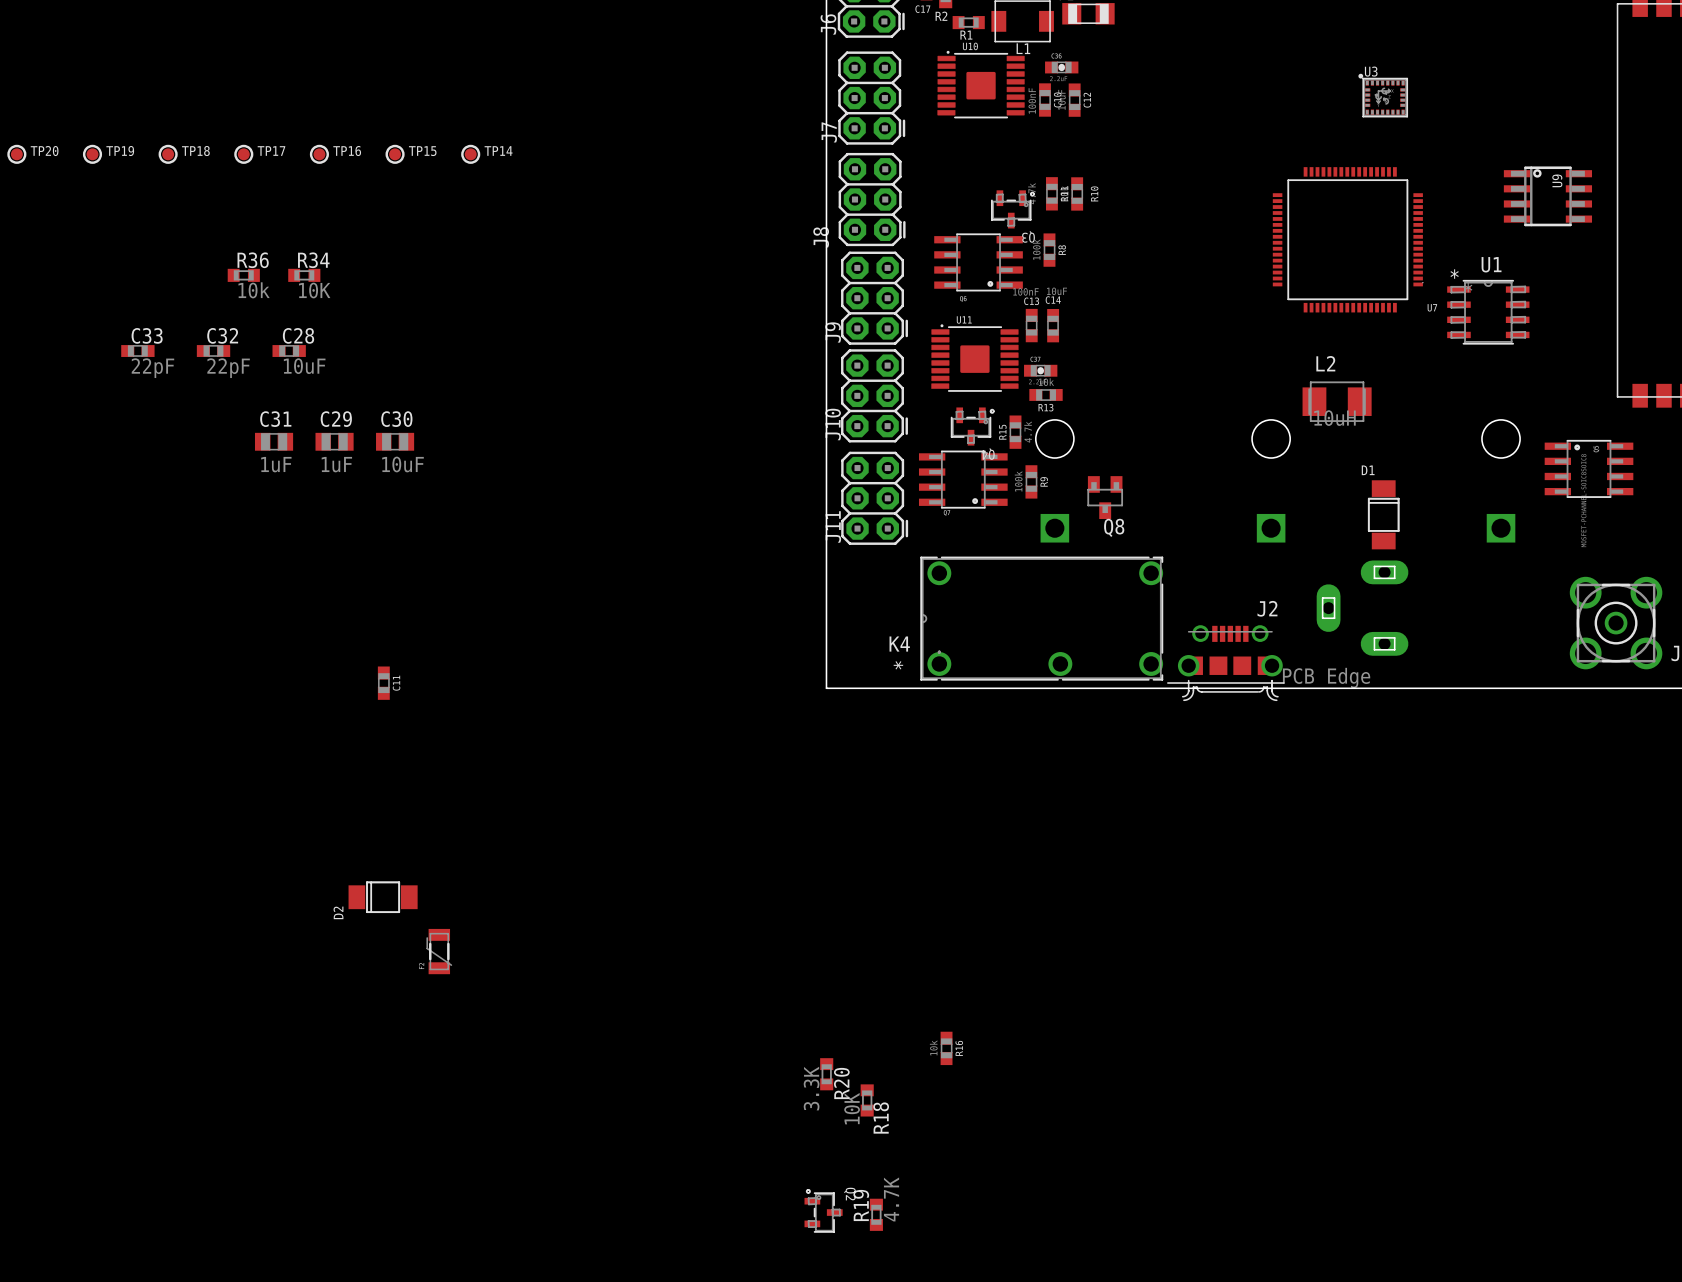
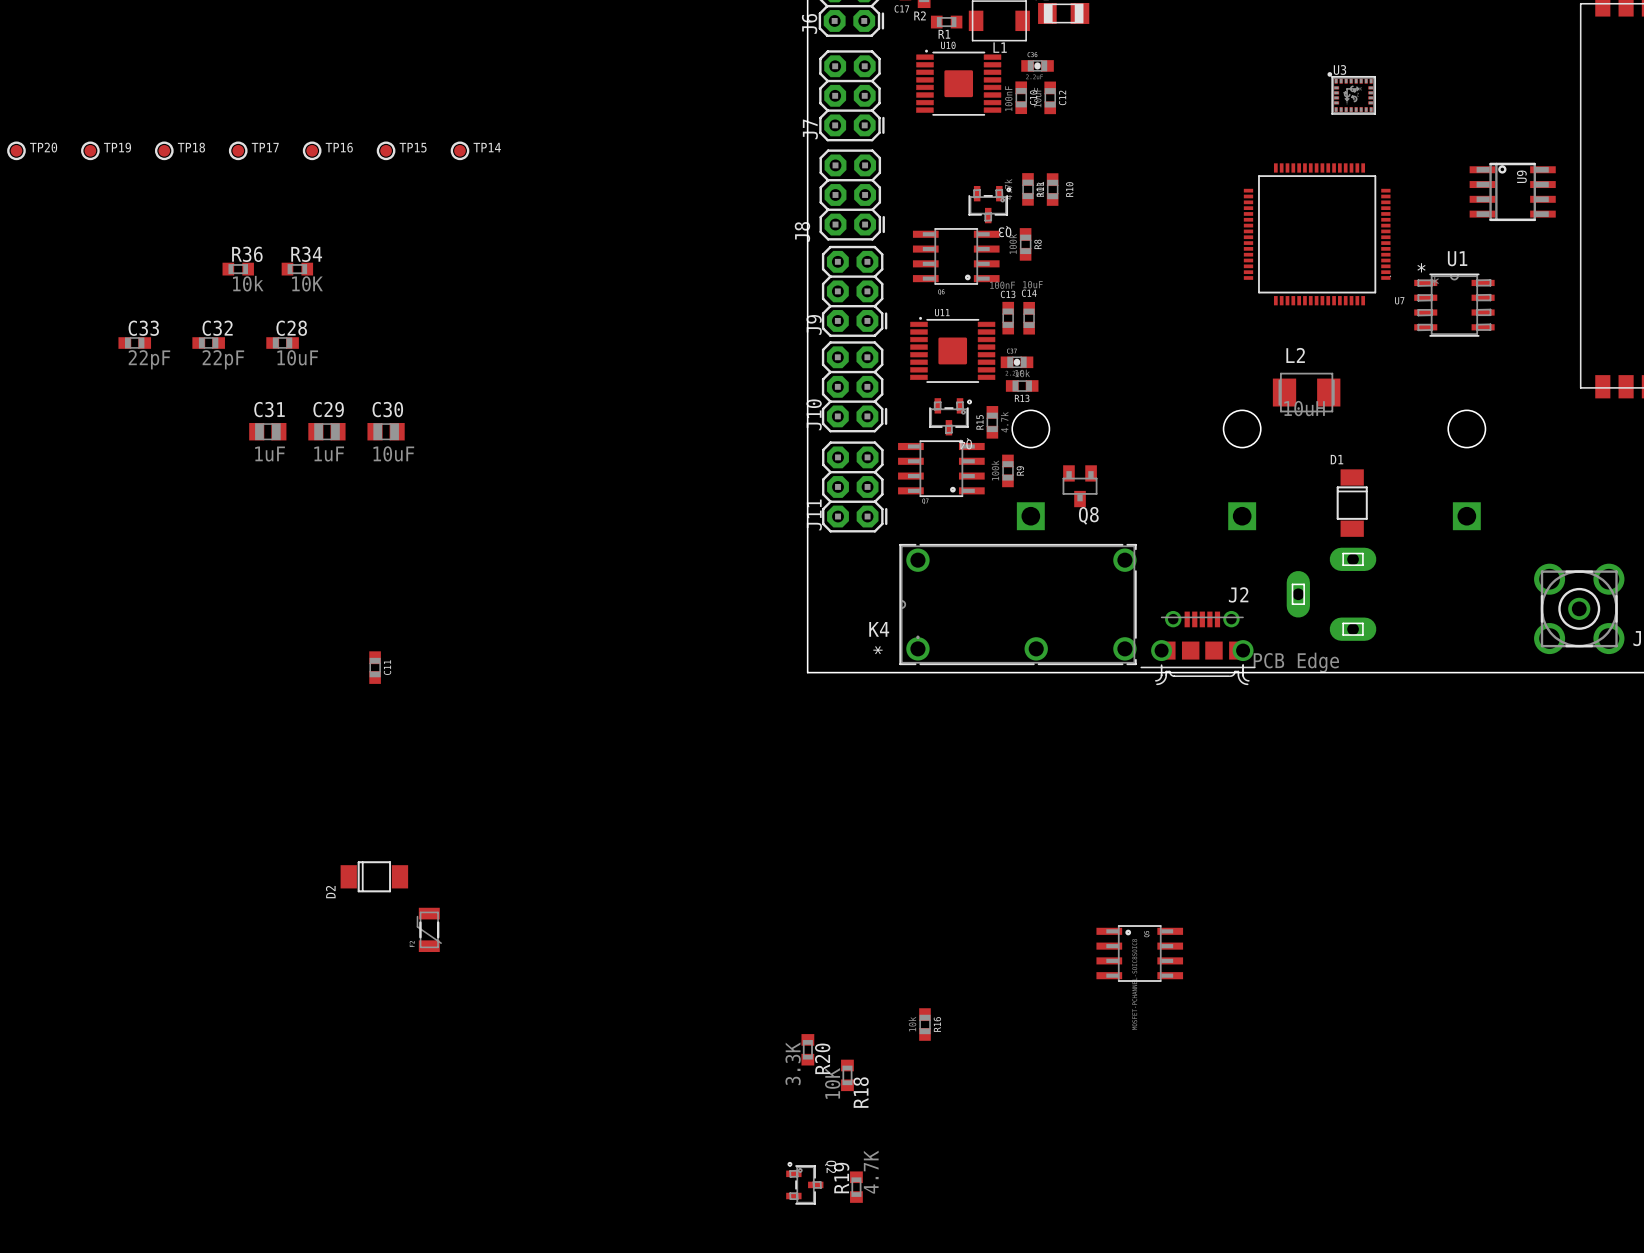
part position: (1589, 468) -> (1139, 953)

